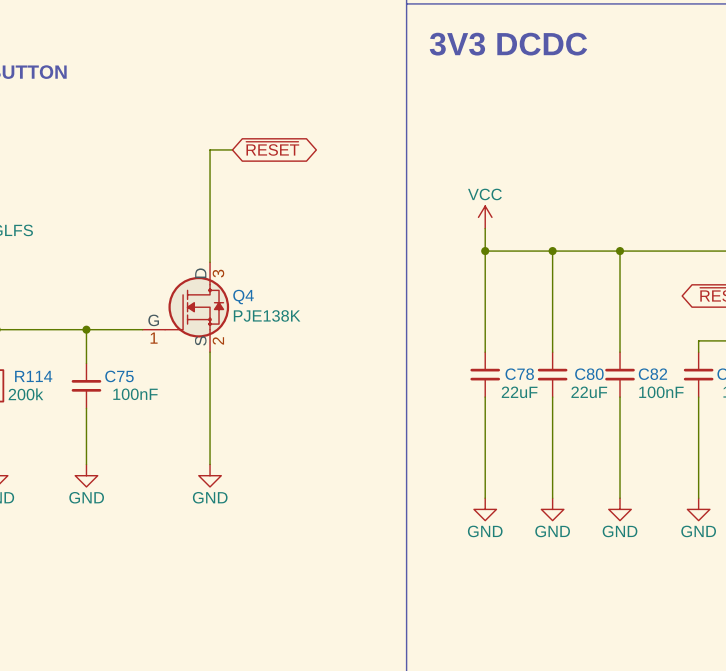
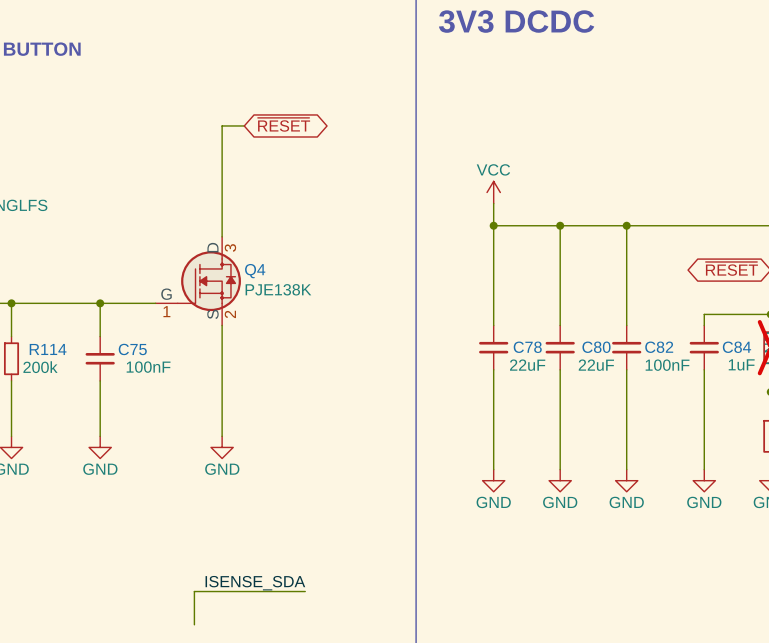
label: none -> ISENSE_SDA (255, 583)
wire: none -> (305, 591) (194, 591) (194, 624)

